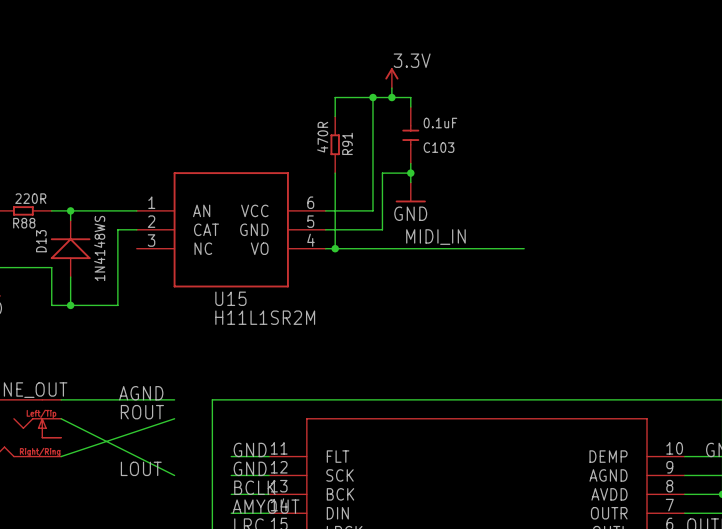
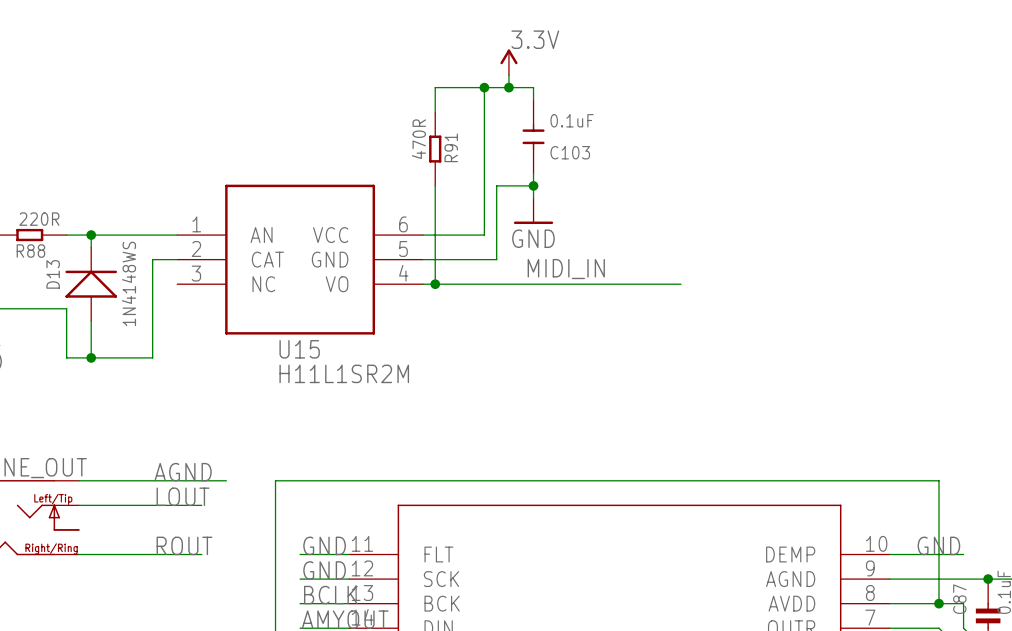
label: ROUT (142, 412) -> LOUT (183, 496)
wire: (61, 418) (174, 475) -> (78, 505) (201, 505)
wire: (174, 418) (61, 456) -> (201, 554) (78, 554)
label: LOUT (141, 468) -> ROUT (184, 545)

